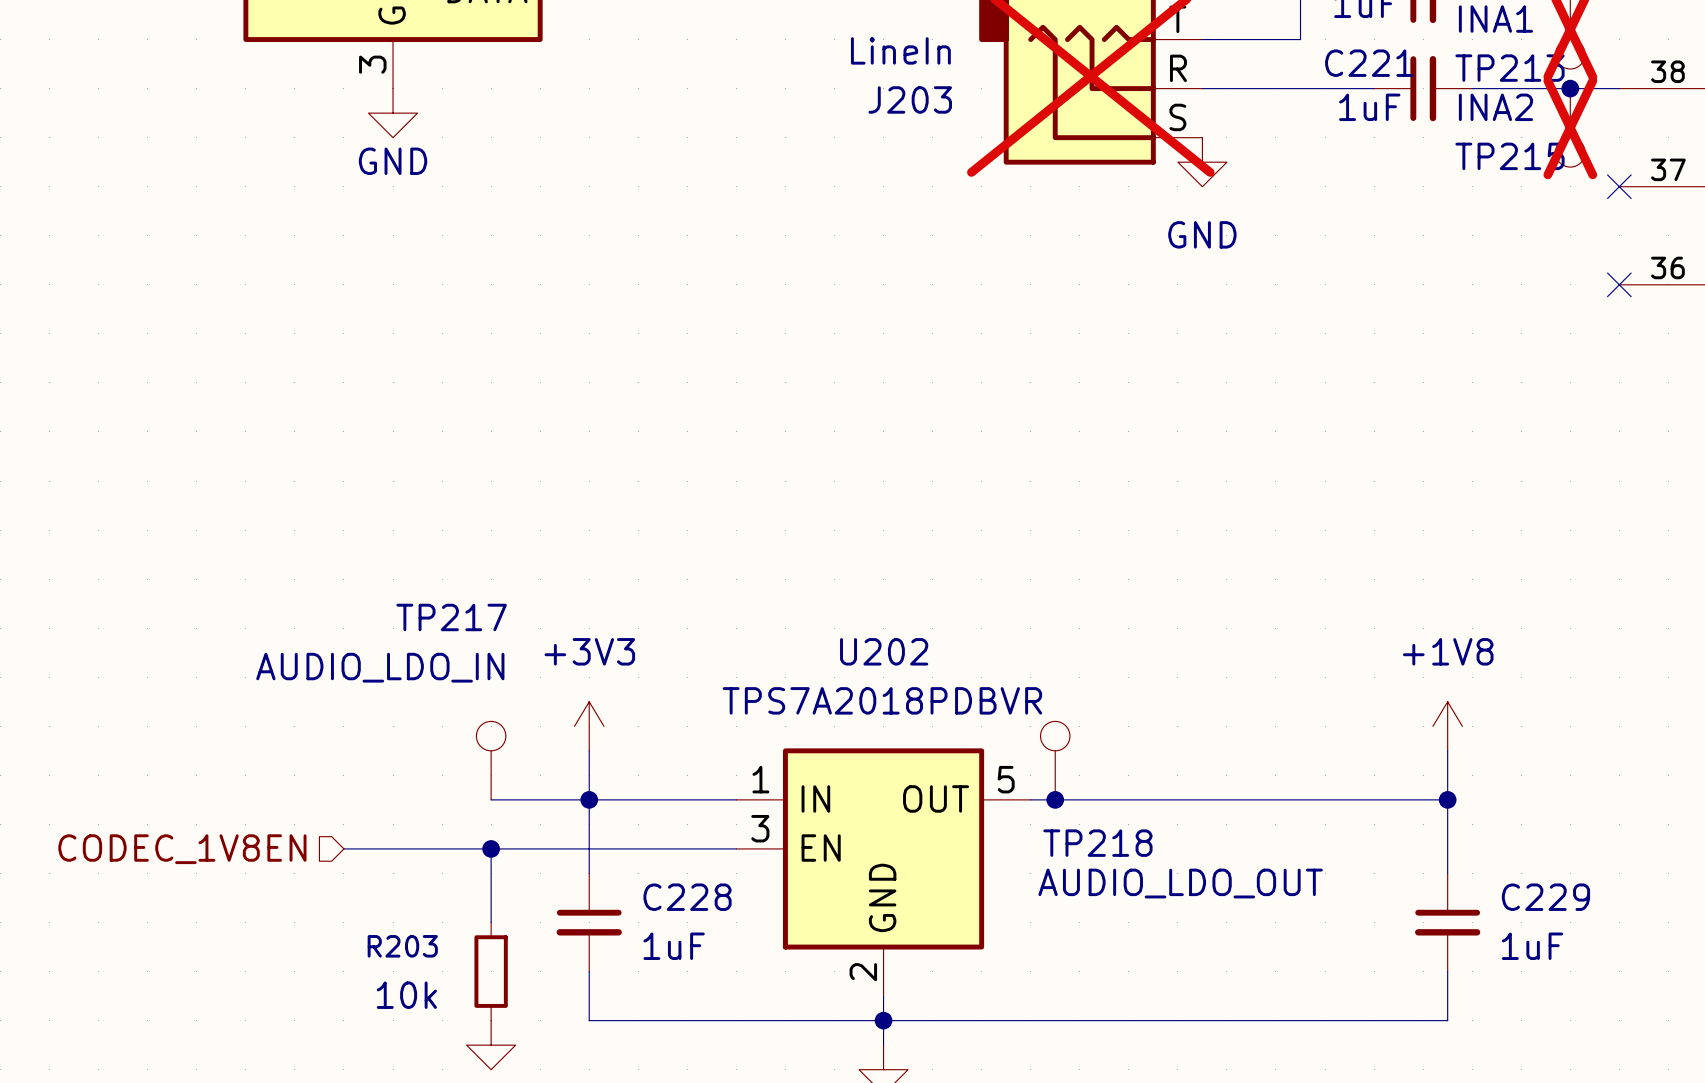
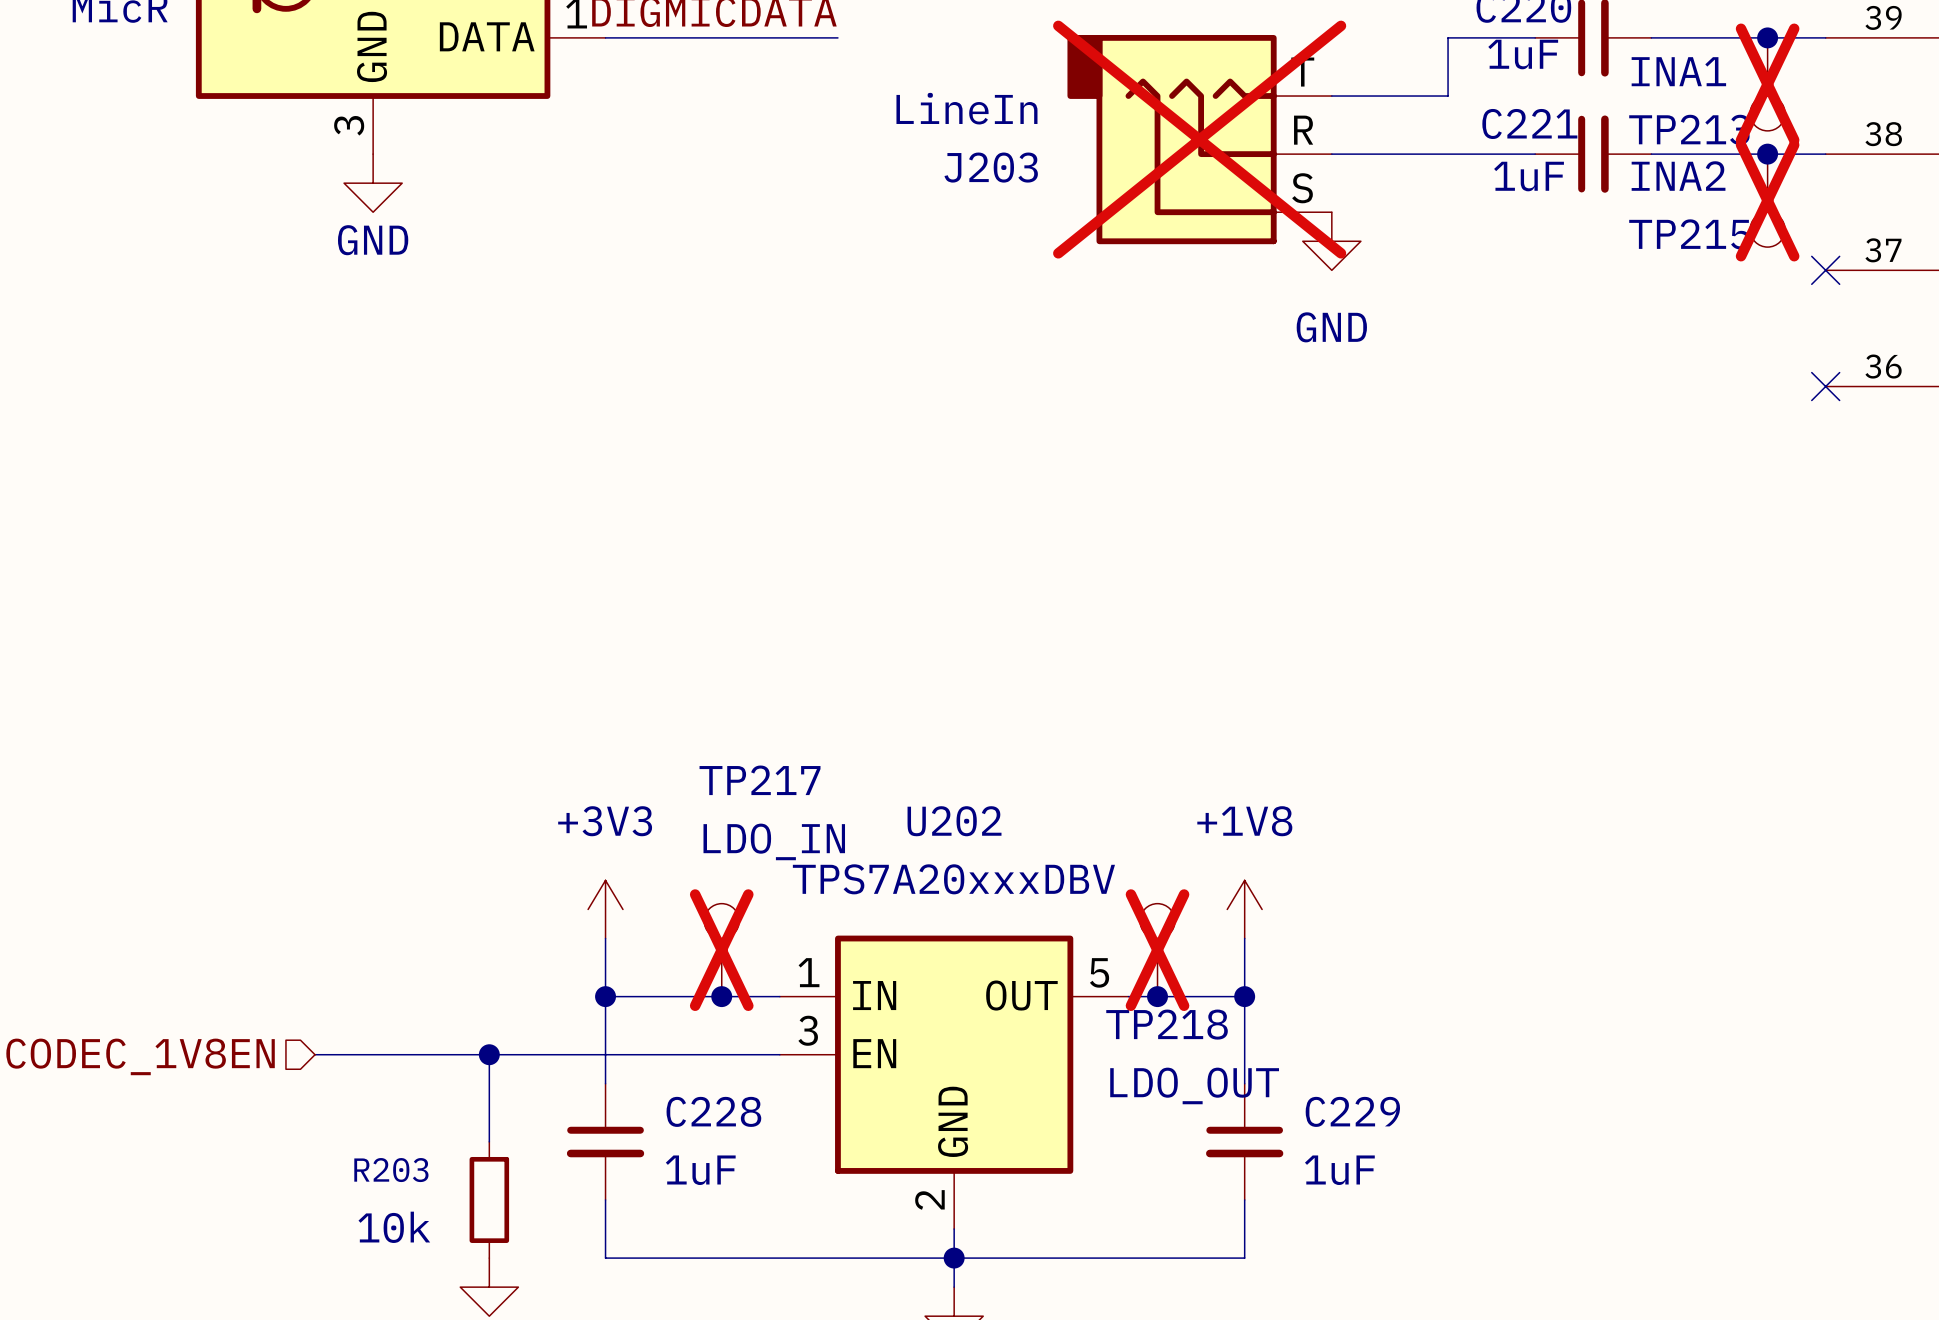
TP217 name position: TP217 (451, 617) -> TP217 (760, 780)
TP217 value: AUDIO_LDO_IN (380, 667) -> LDO_IN (774, 841)
U202 value: TPS7A2018PDBVR (882, 700) -> TPS7A20xxxDBV (953, 879)
power symbol position: +1V8 (1447, 726) -> +1V8 (1244, 909)
wire: (1447, 750) (1447, 873) -> (1244, 938) (1244, 1083)
TP217 position: (491, 760) -> (721, 950)
TP217 do-not-place cross: none -> (721, 950)
TP218 do-not-place cross: none -> (1157, 950)
wire: (491, 799) (589, 799) -> none
junction: none -> (721, 996)
wire: (1128, 799) (1447, 799) -> none
junction: none -> (1244, 996)
junction: (1447, 799) -> none
TP218 name position: TP218 (1097, 843) -> TP218 (1167, 1024)
TP218 value: AUDIO_LDO_OUT (1180, 883) -> LDO_OUT (1194, 1085)
C229 position: (1447, 922) -> (1244, 1141)
wire: (1447, 971) (1447, 1020) (1128, 1020) -> (1244, 1199) (1244, 1258)

